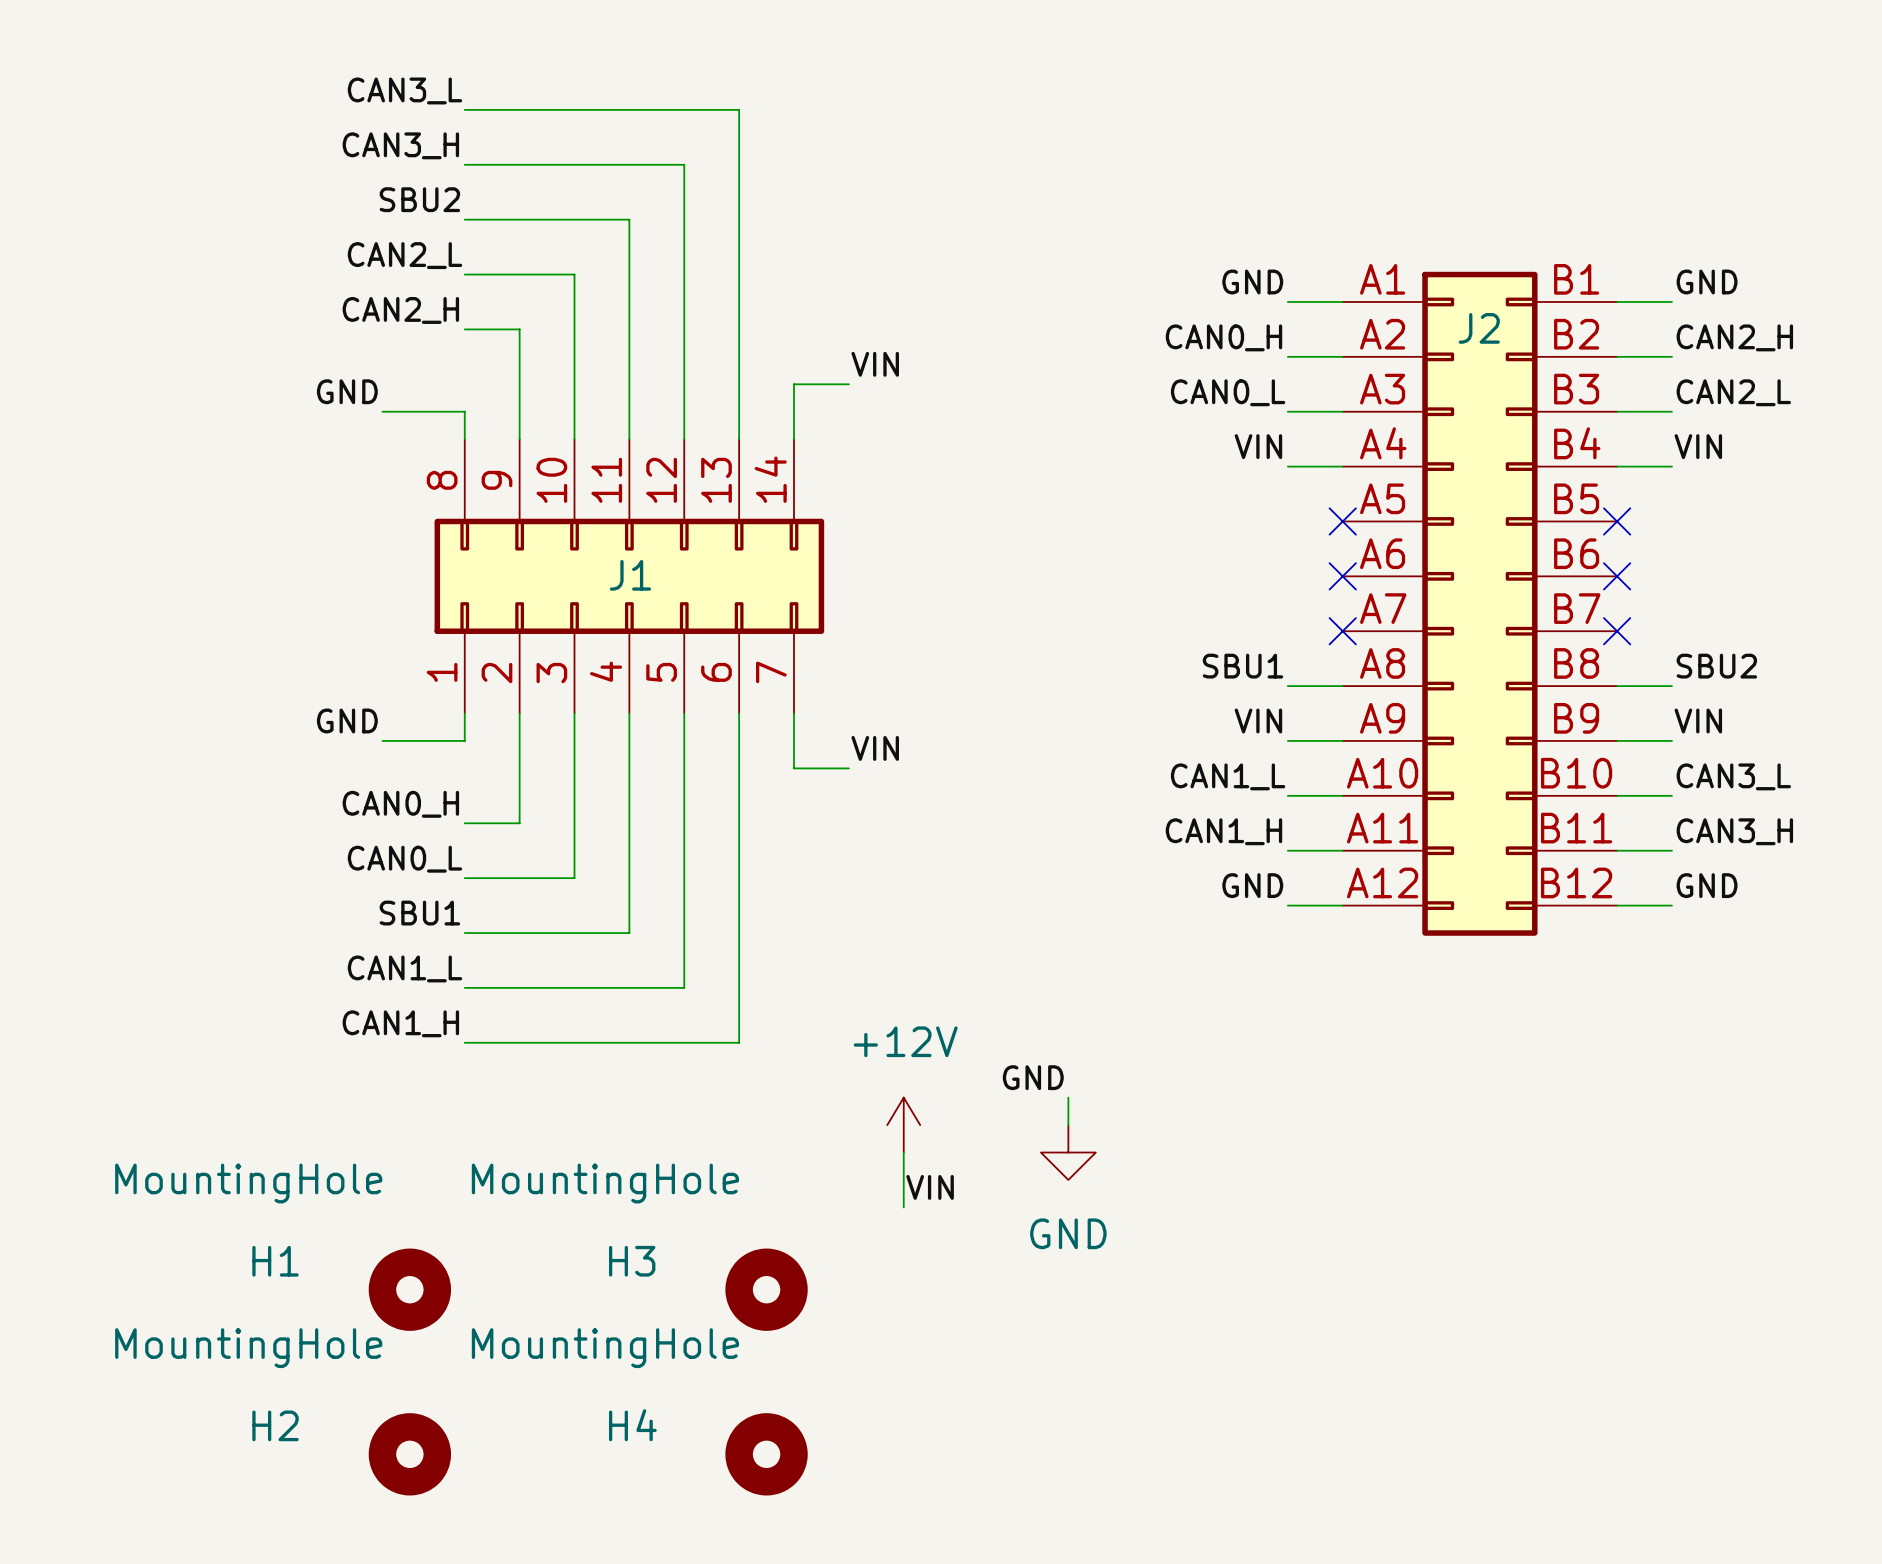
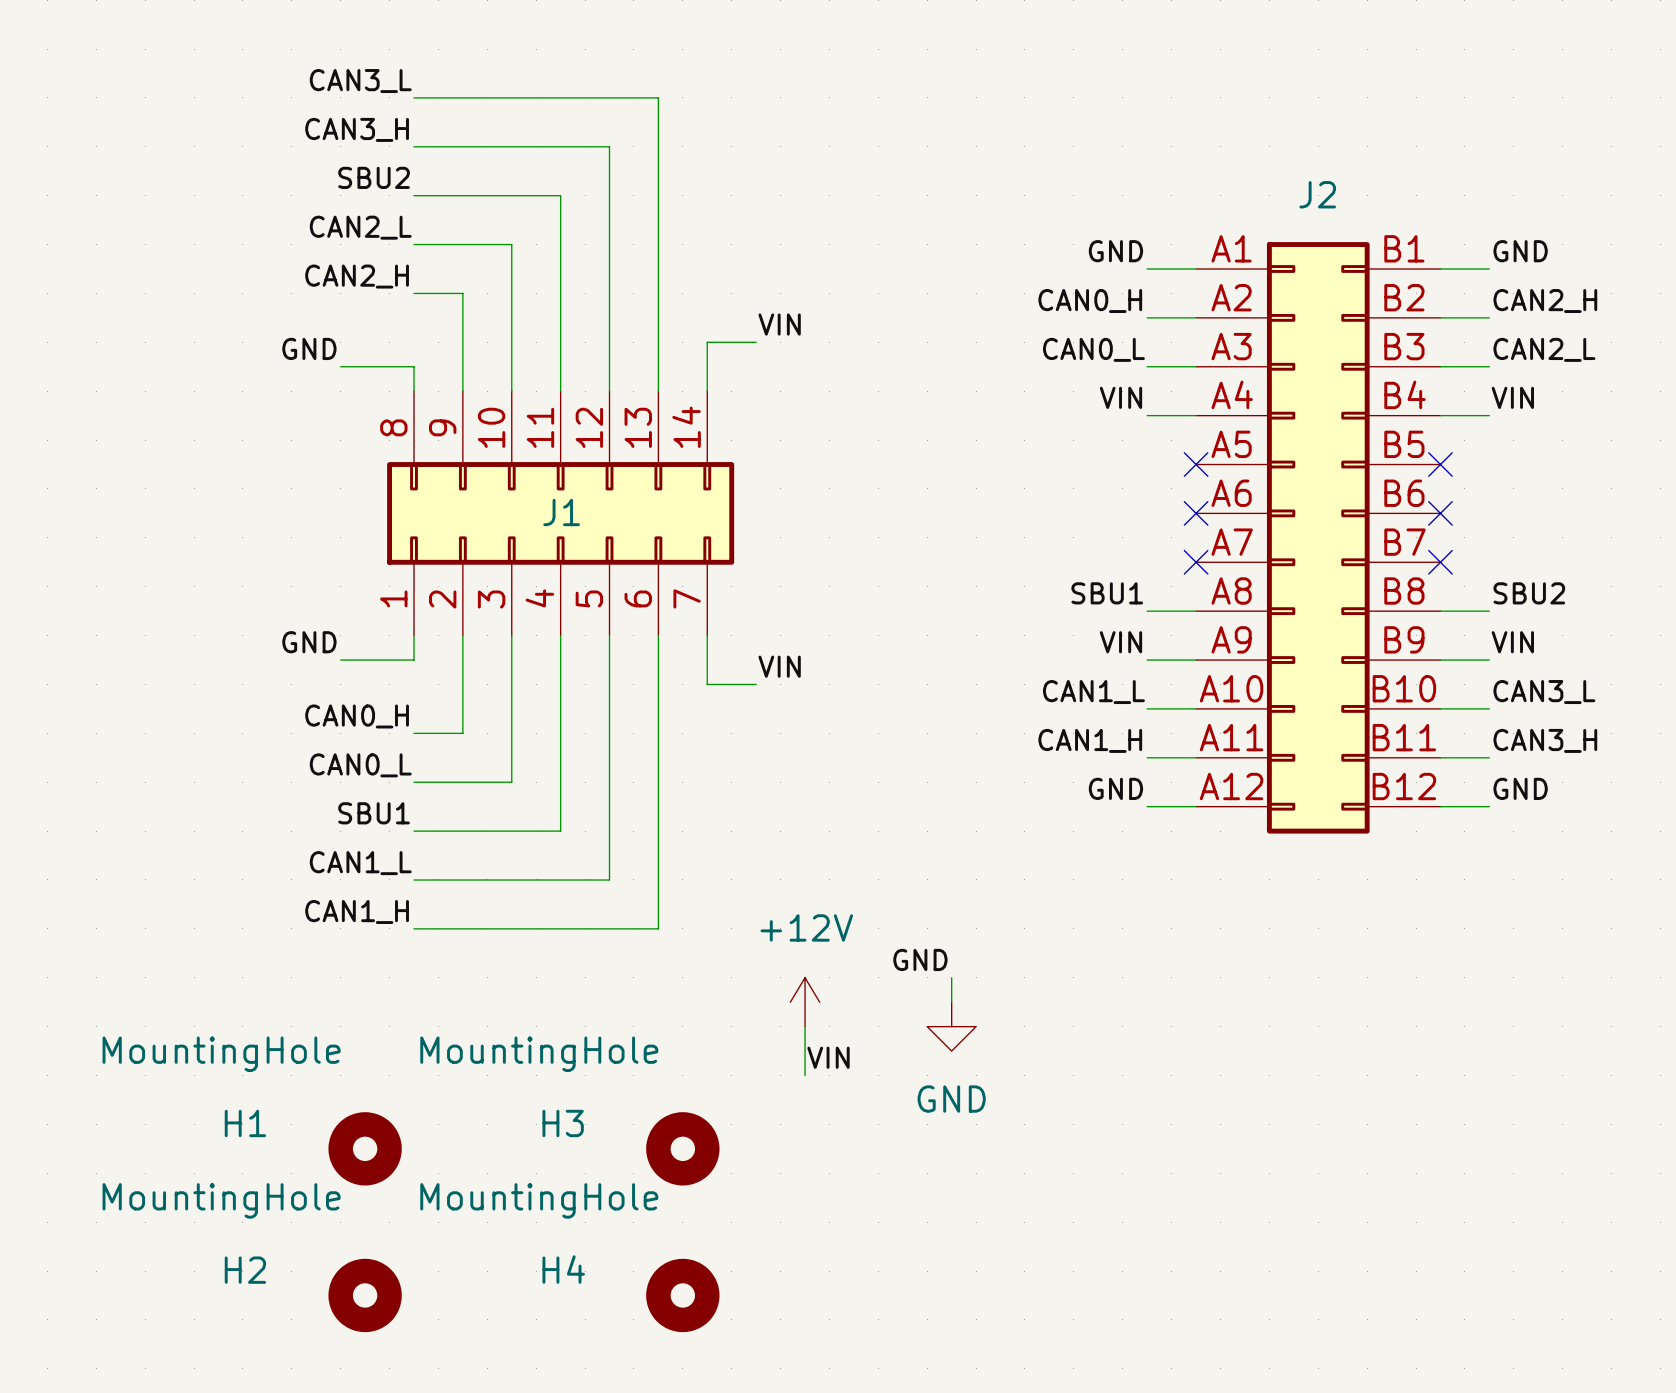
J2 name position: J2 (1479, 328) -> J2 (1317, 194)

